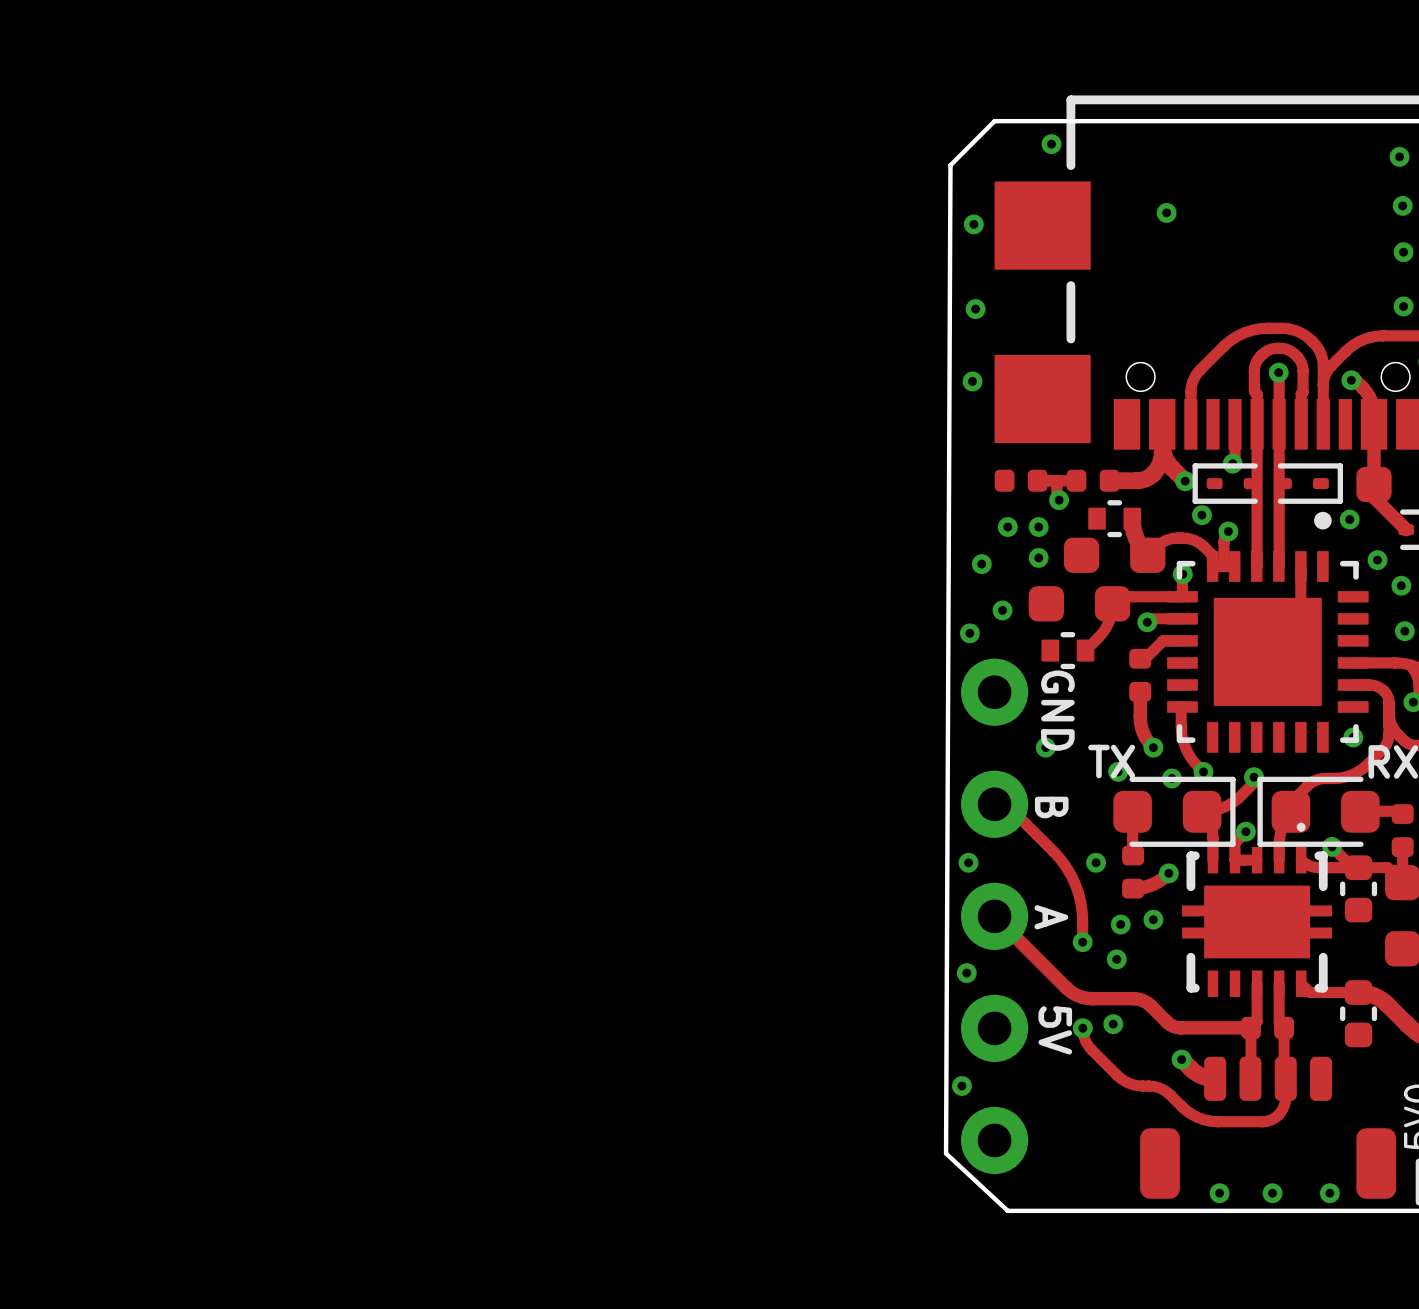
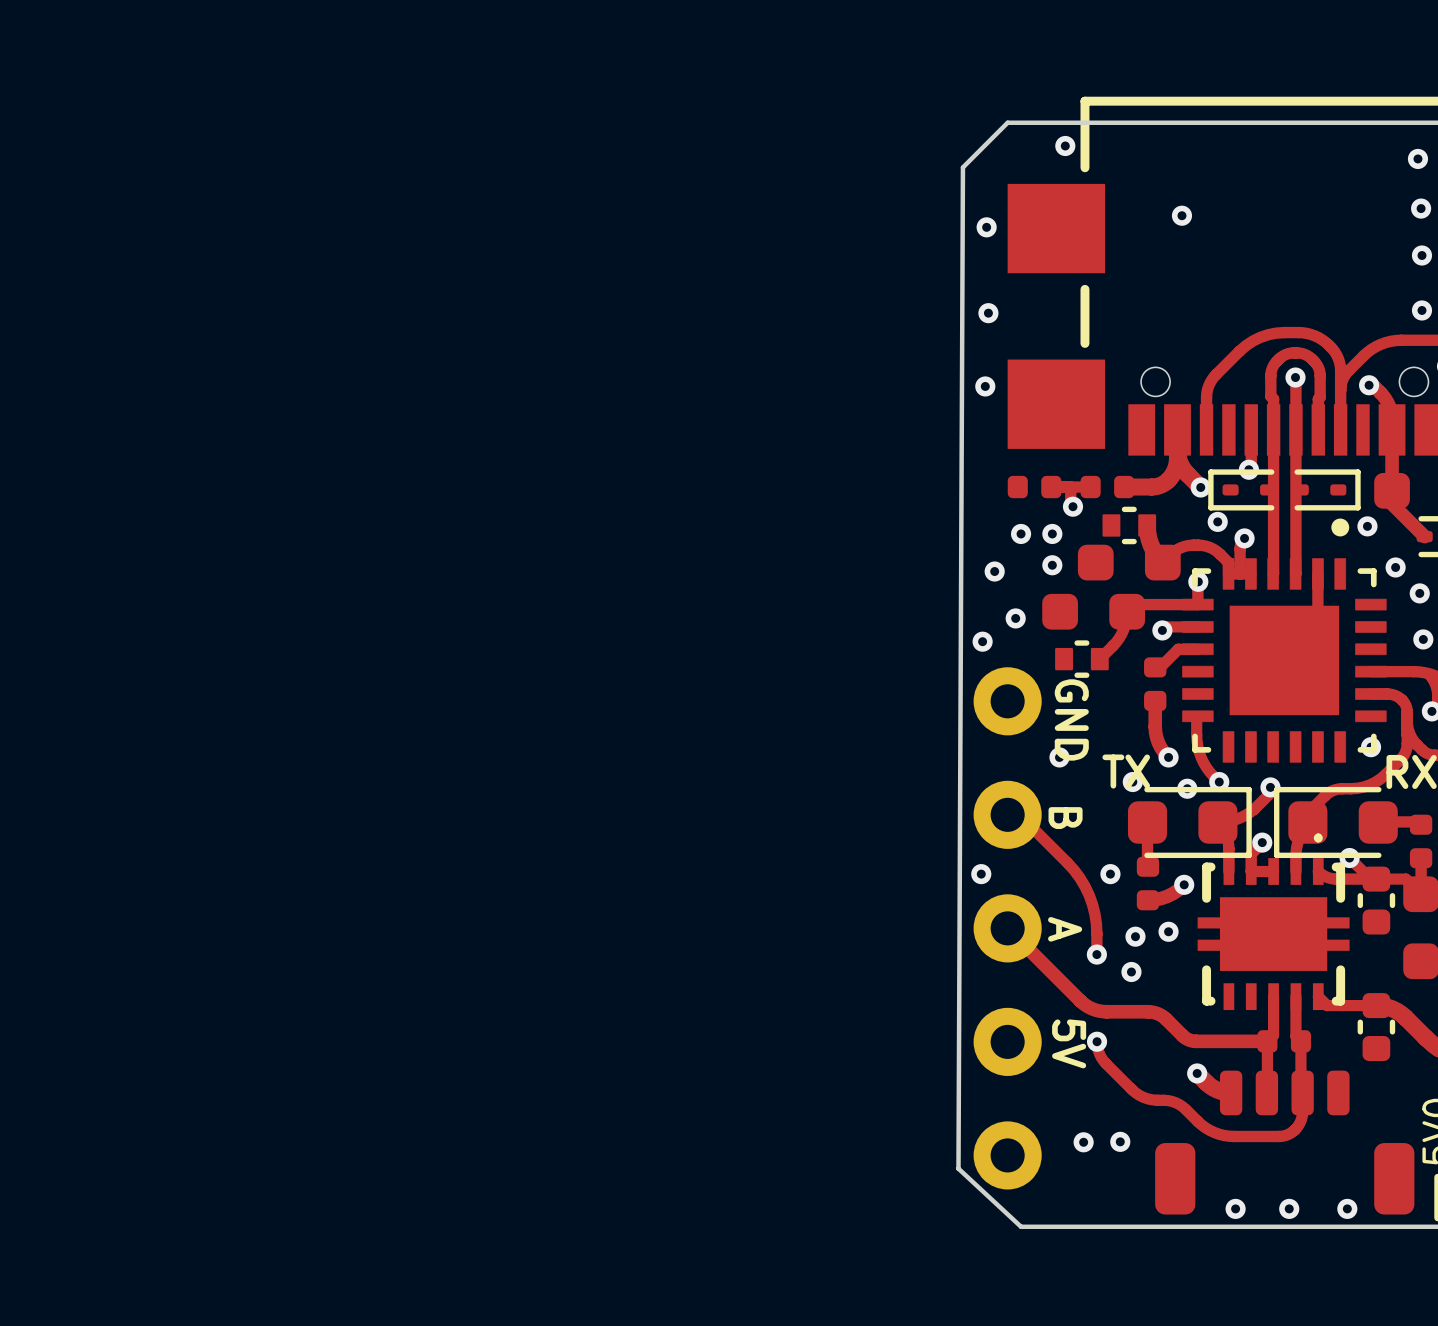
via: (966, 973) -> none
via: (1113, 1024) -> none
via: (961, 1086) -> none
via: none -> (1083, 1142)
via: none -> (1120, 1141)

